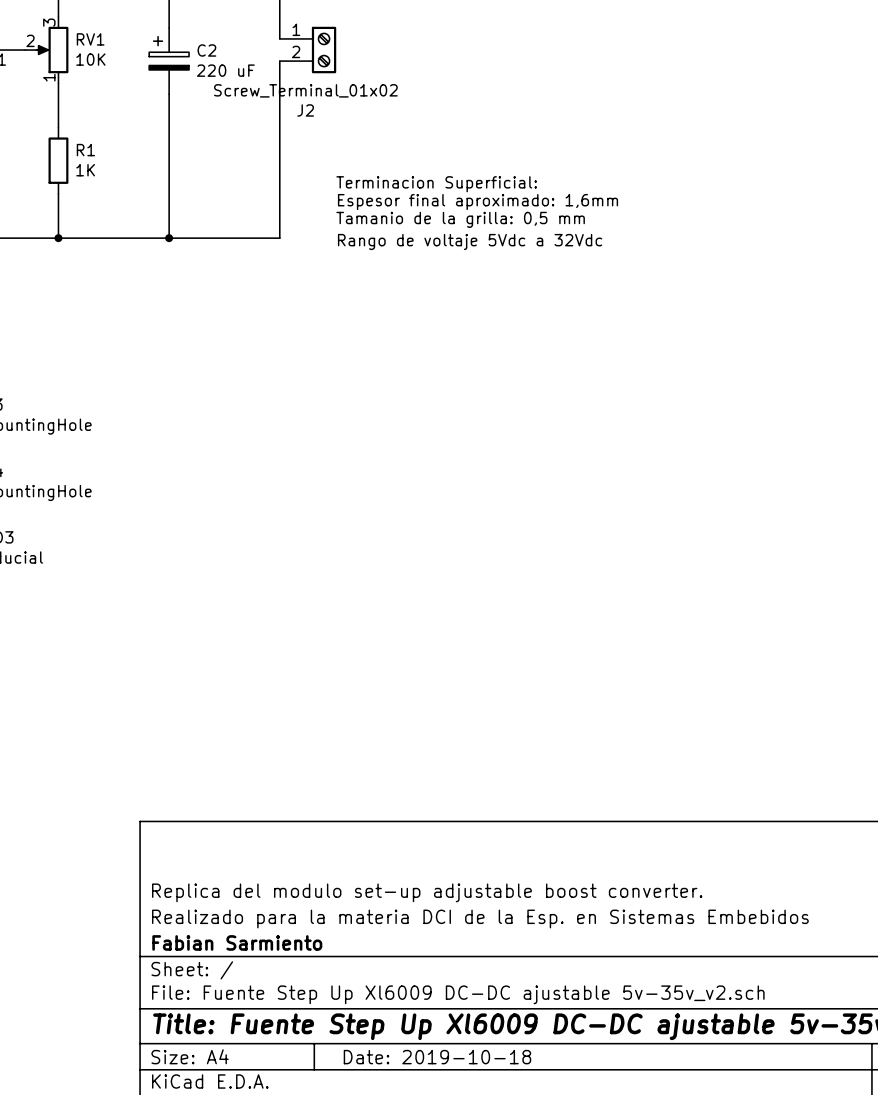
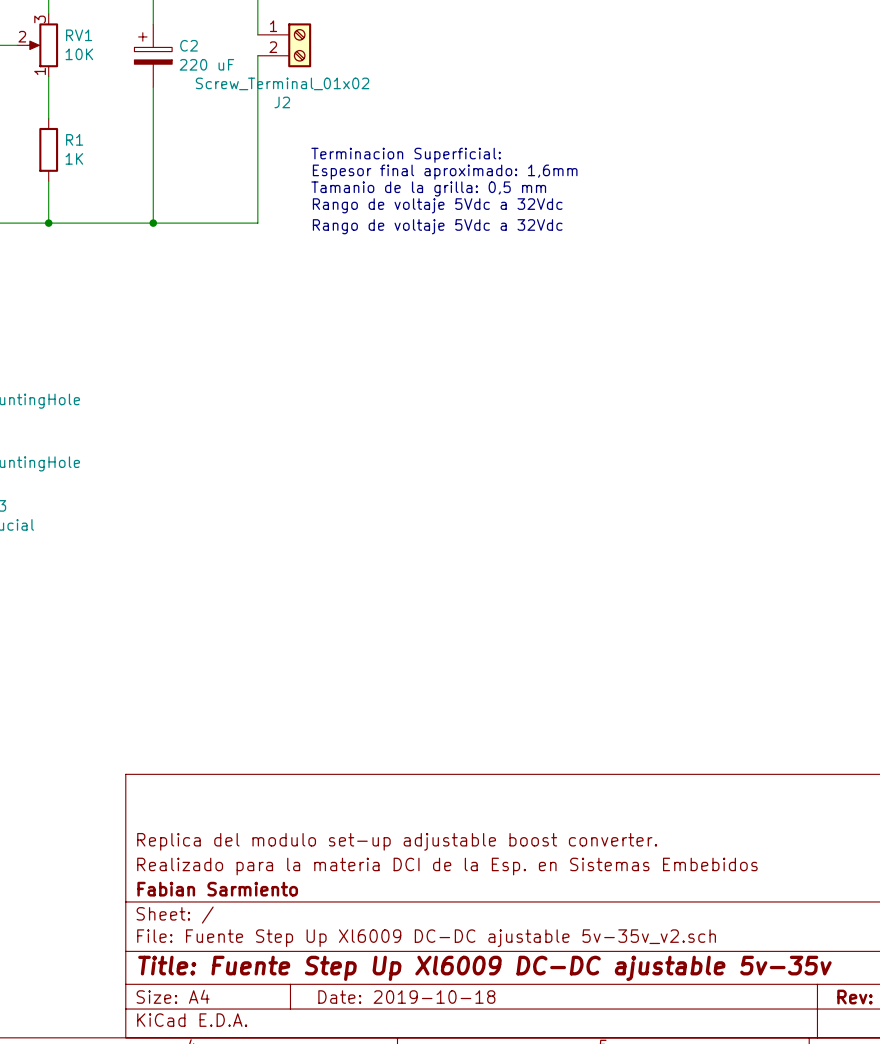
text: none -> Terminacion Superficial: (406, 155)
text: Terminacion Superficial: (436, 184) -> Espesor final aproximado: 1,6mm (445, 172)
text: Espesor final aproximado: 1,6mm (478, 202) -> Tamanio de la grilla: 0,5 mm (428, 188)
text: Tamanio de la grilla: 0,5 mm (460, 219) -> Rango de voltaje 5Vdc a 32Vdc (437, 205)

